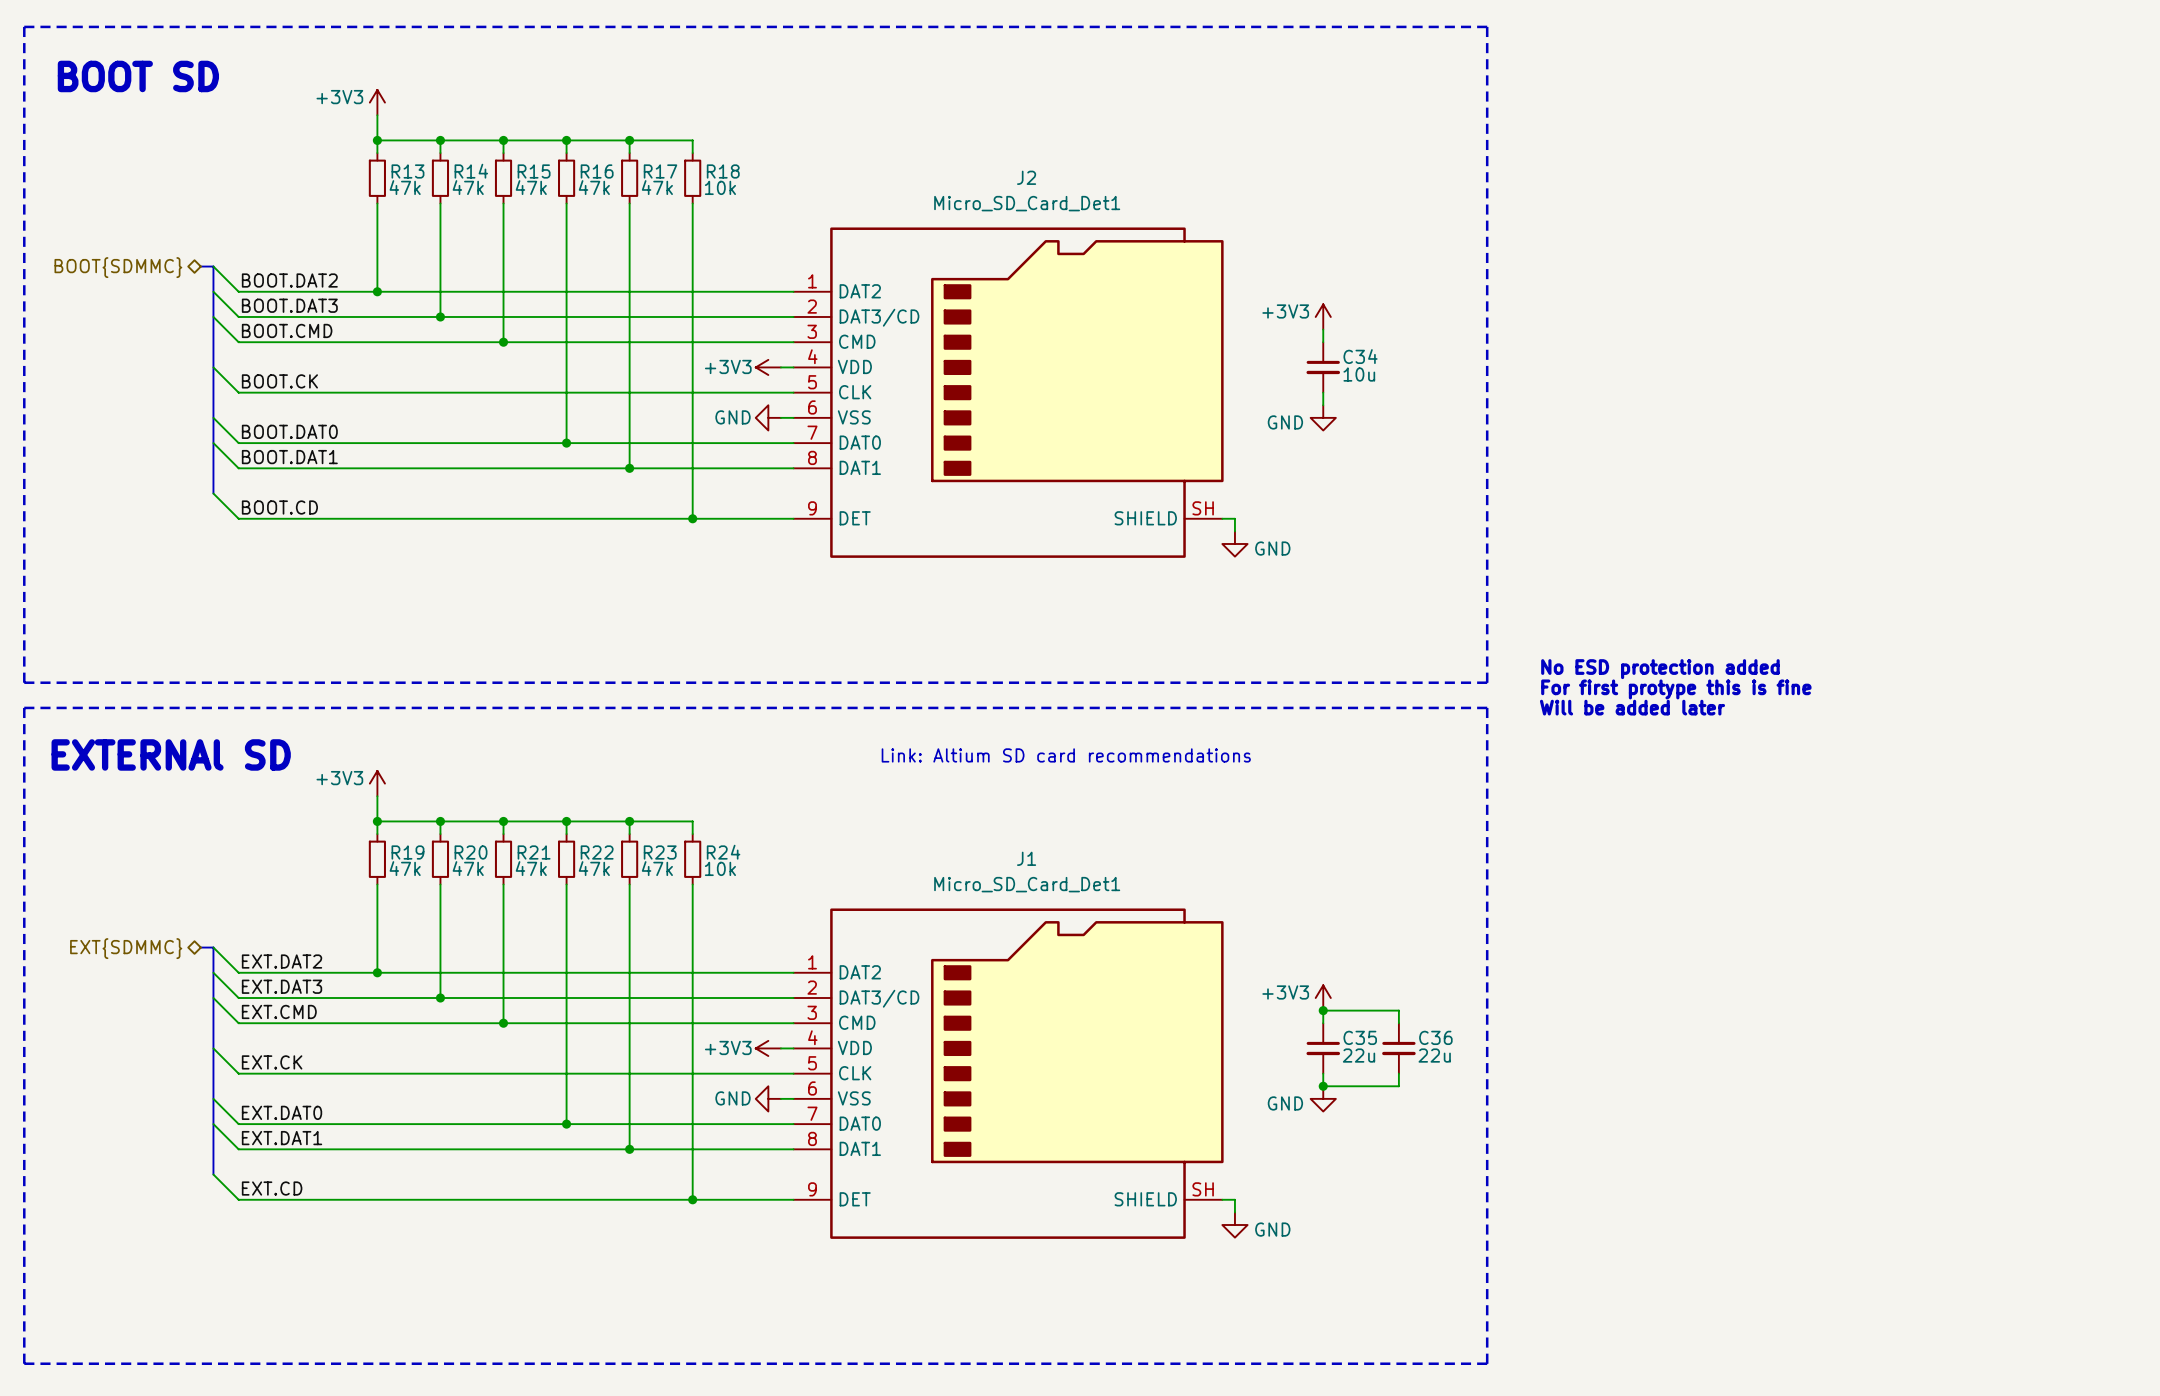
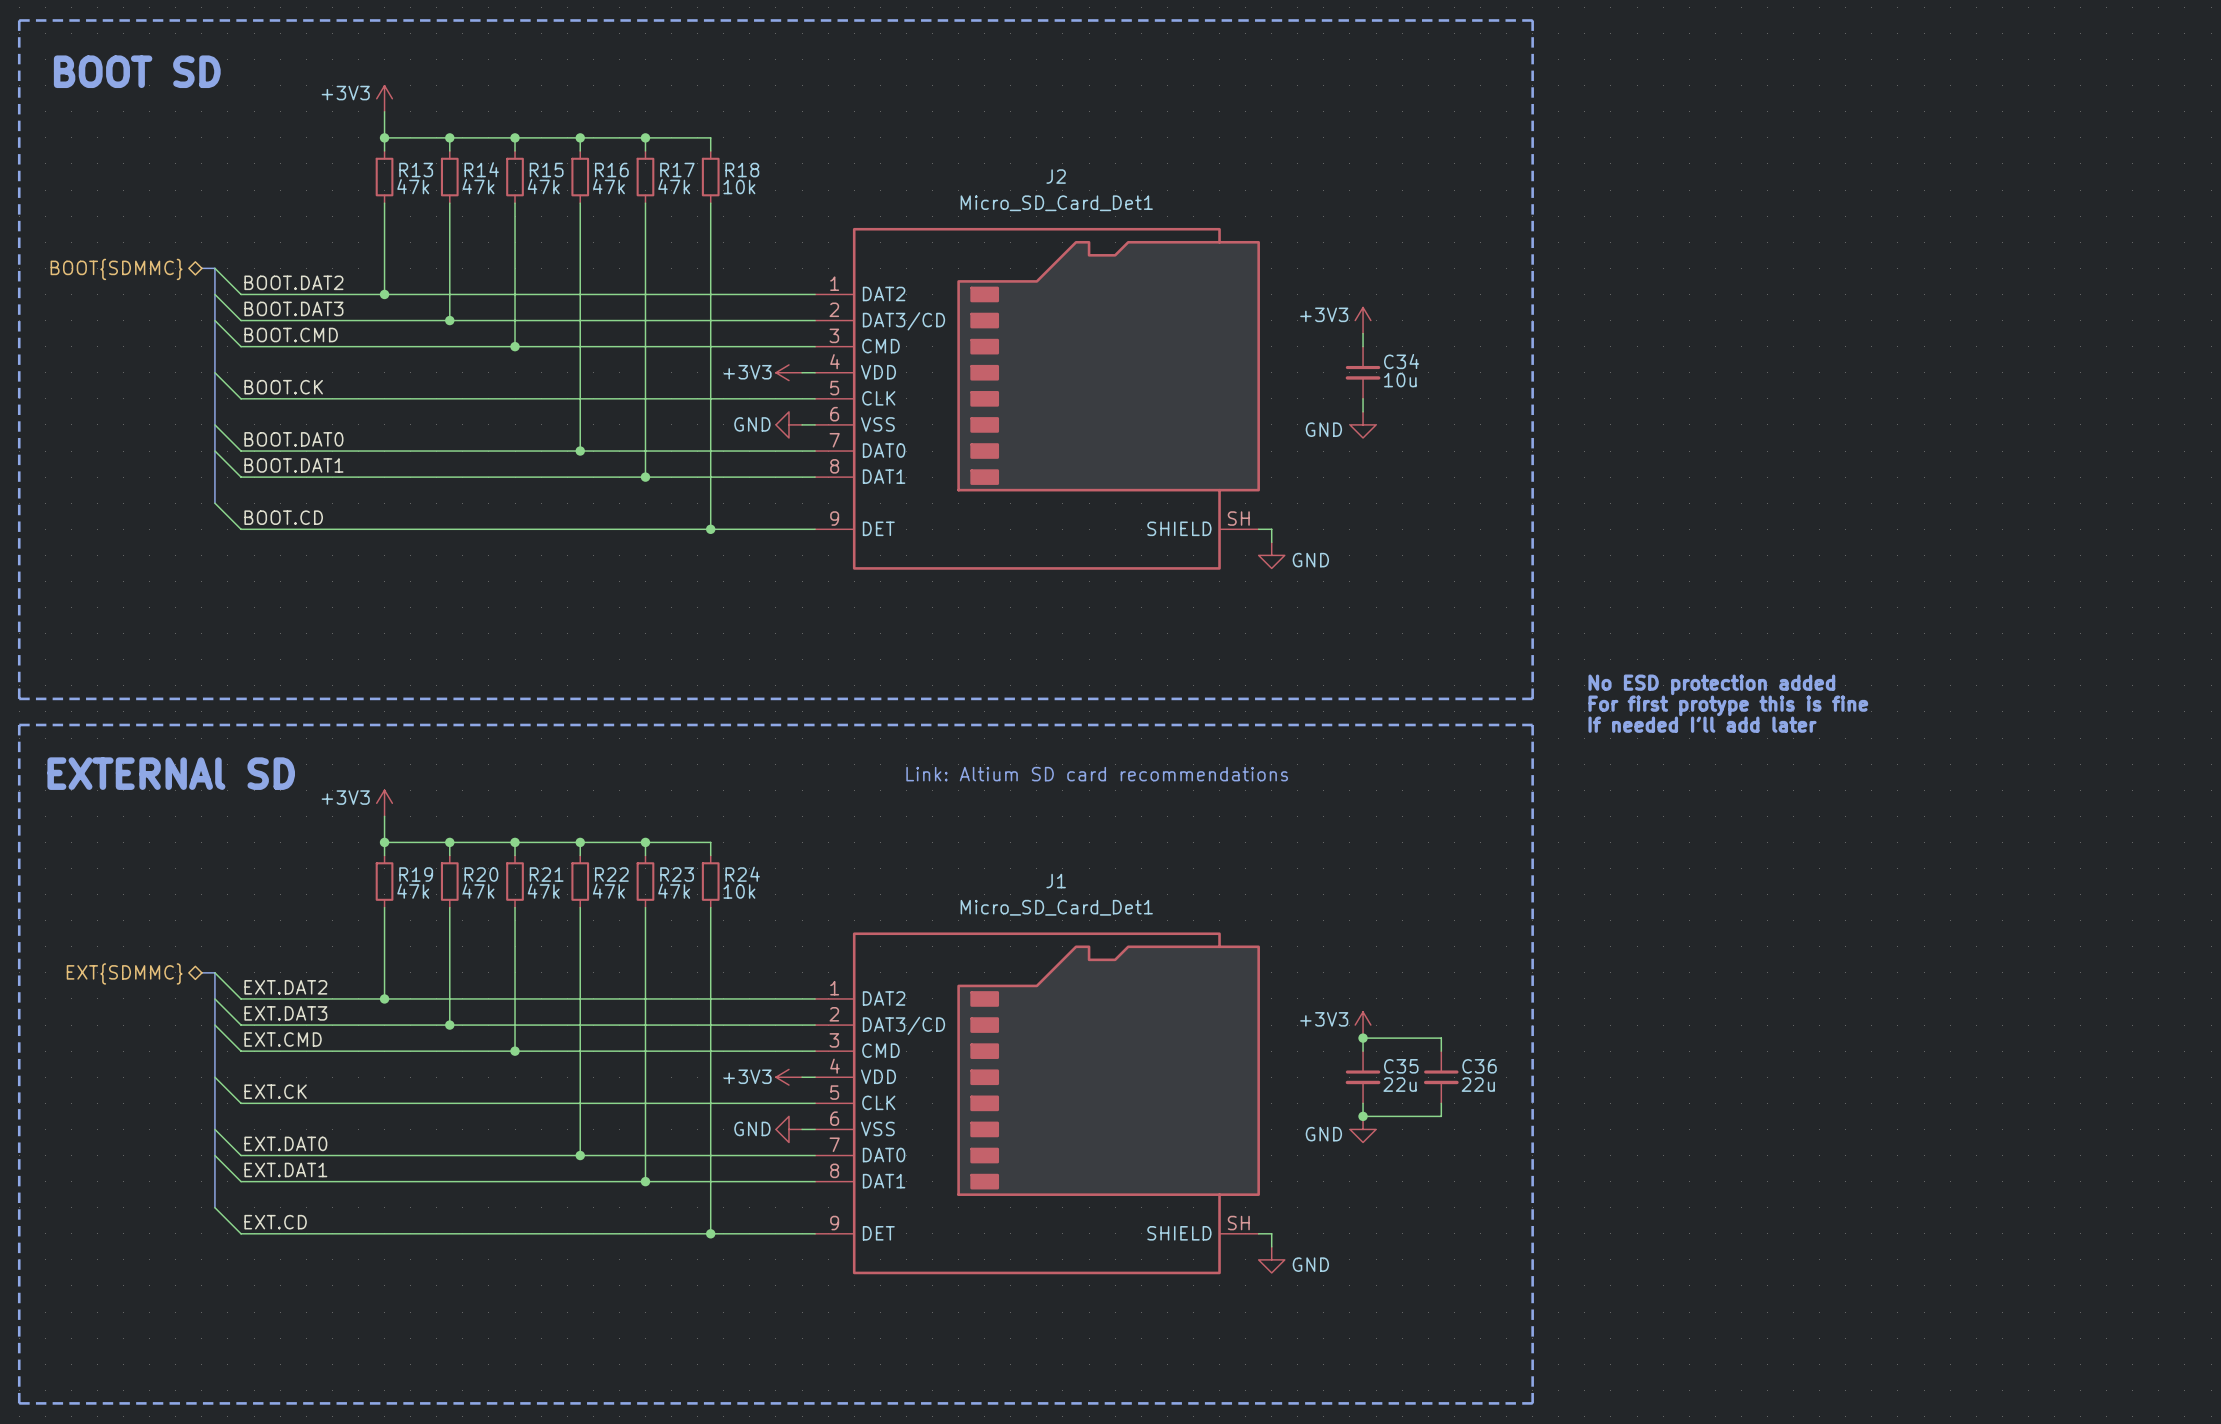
text: Will be added later (1632, 707) -> If needed I'll add later (1702, 724)

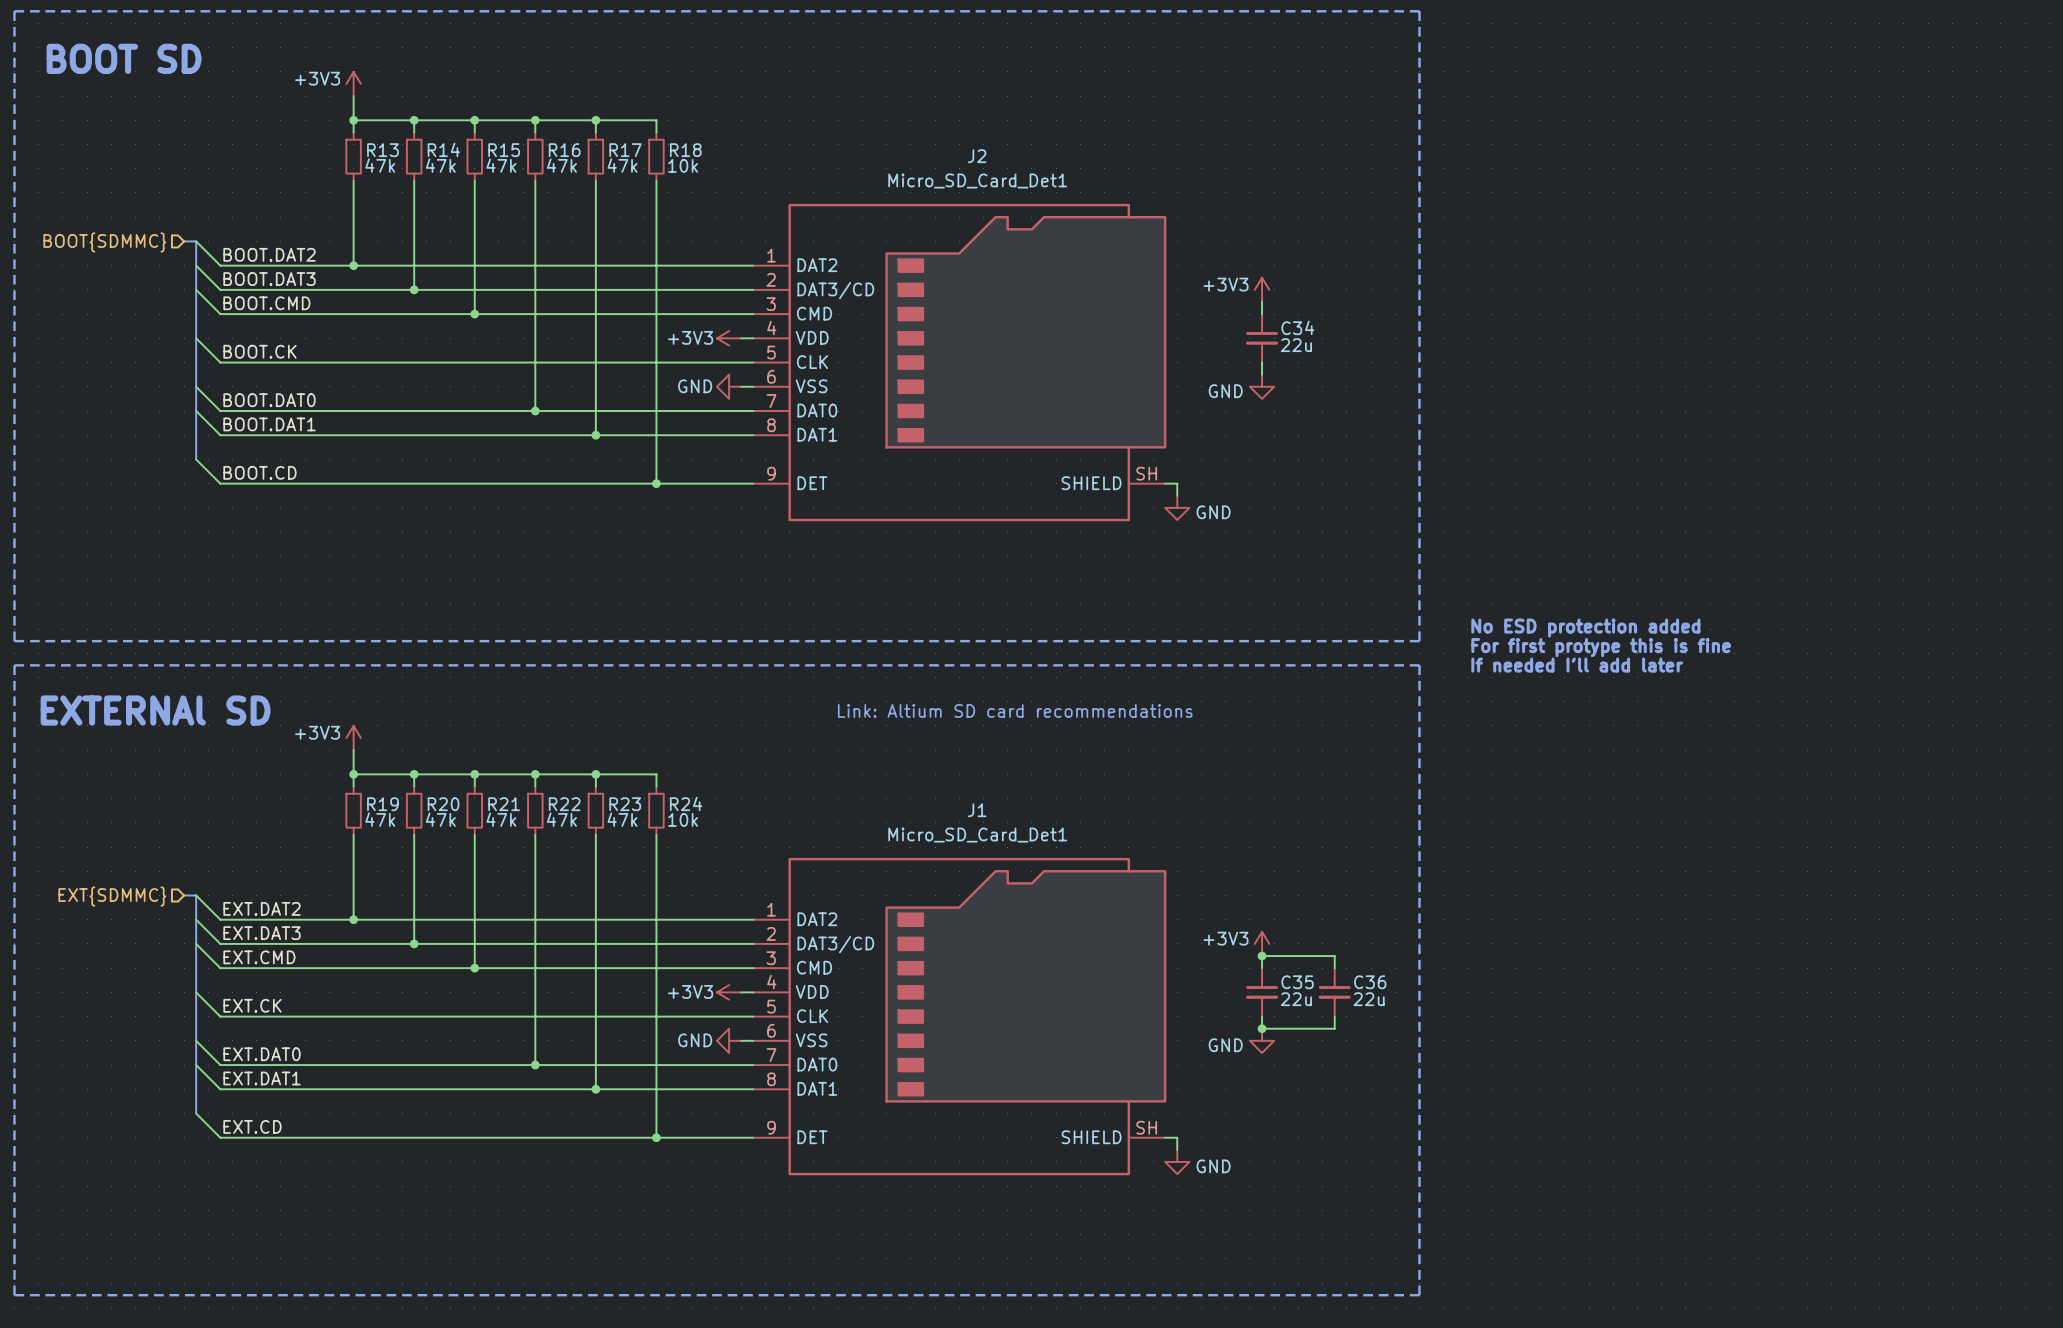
hierarchical label shape: bidirectional (116, 269) -> input (104, 242)
C34 value: 10u (1400, 380) -> 22u (1296, 345)
hierarchical label shape: bidirectional (124, 973) -> input (112, 896)

